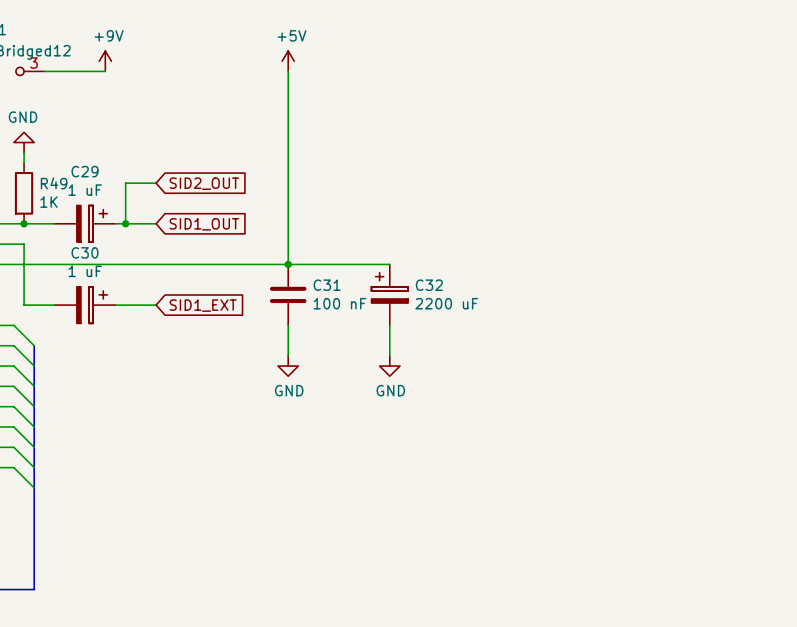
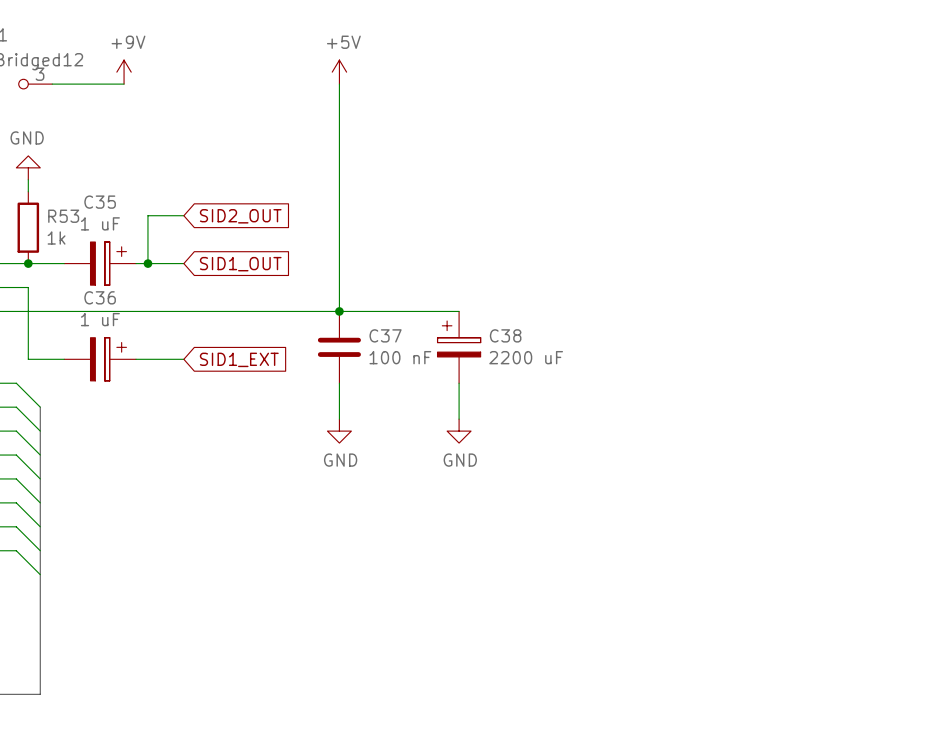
C29 name: C29 (85, 171) -> C35 (100, 202)
R49 name: R49 (54, 183) -> R53 (63, 216)
R49 value: 1K (48, 202) -> 1k (56, 238)
C30 name: C30 (85, 252) -> C36 (100, 297)
C31 name: C31 (327, 285) -> C37 (385, 335)
C32 name: C32 (429, 285) -> C38 (505, 335)

